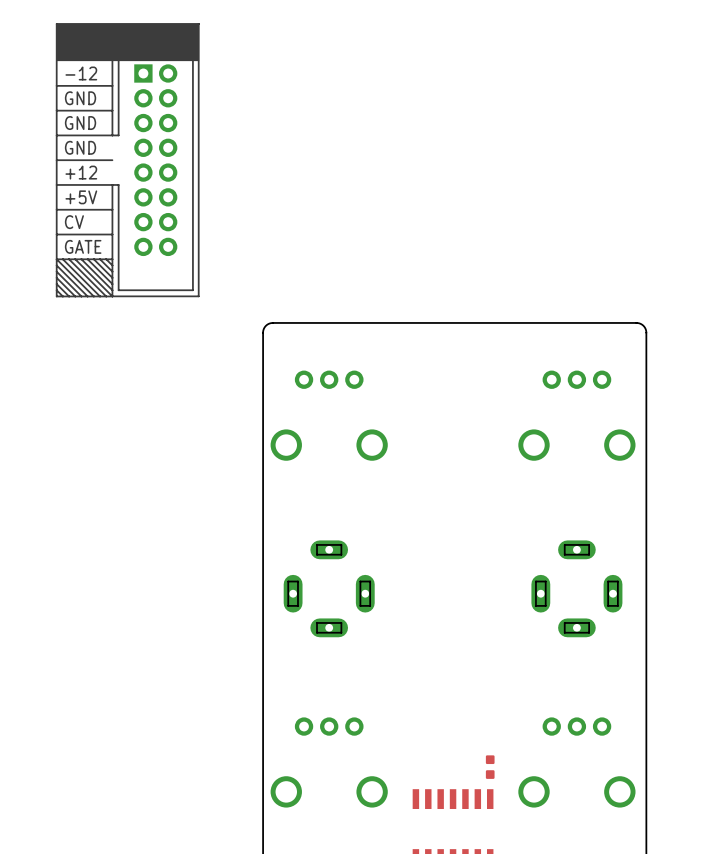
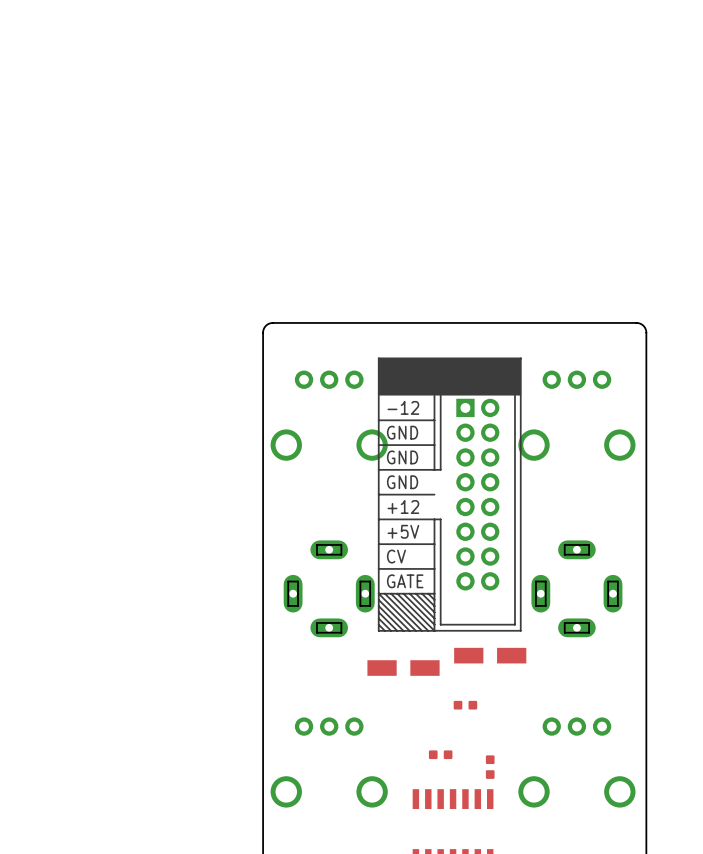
part: (127, 160) -> none
part: none -> (449, 494)
part: none -> (490, 655)
part: none -> (403, 668)
part: none -> (465, 705)
part: none -> (440, 754)

